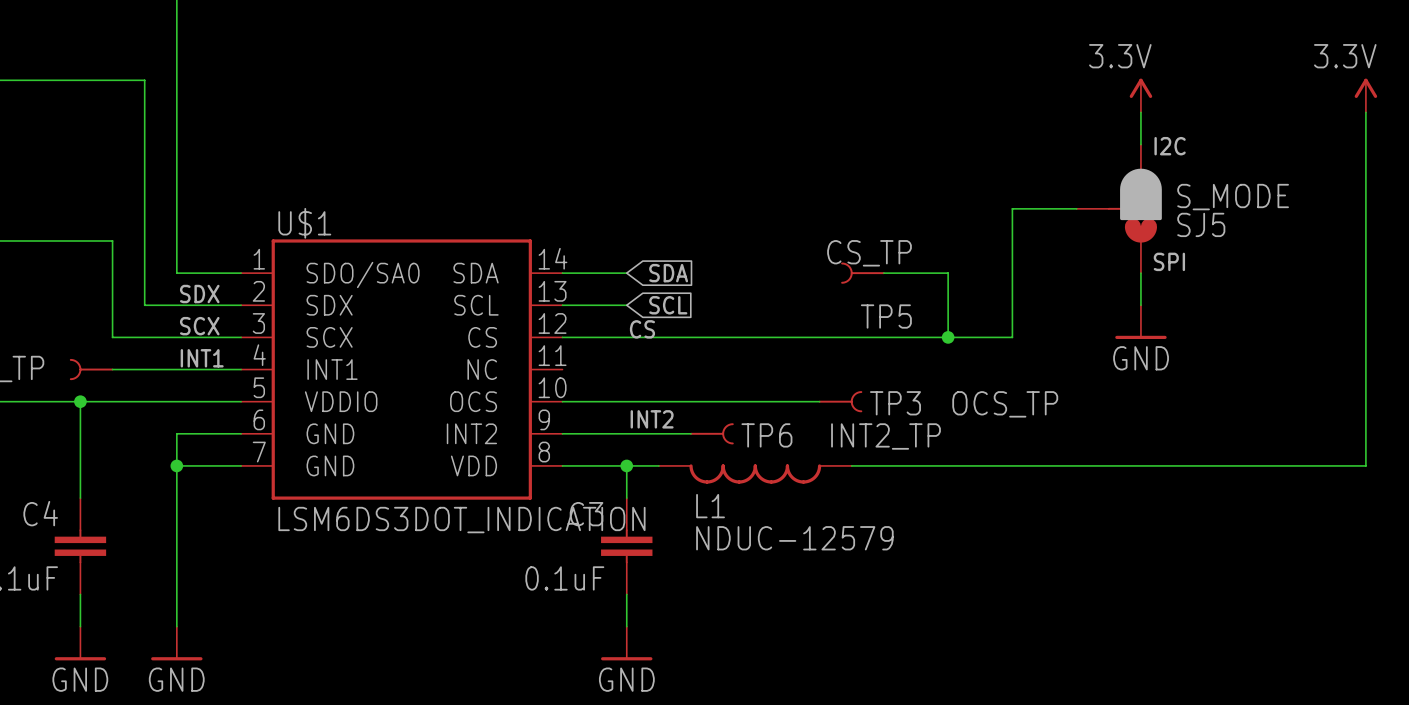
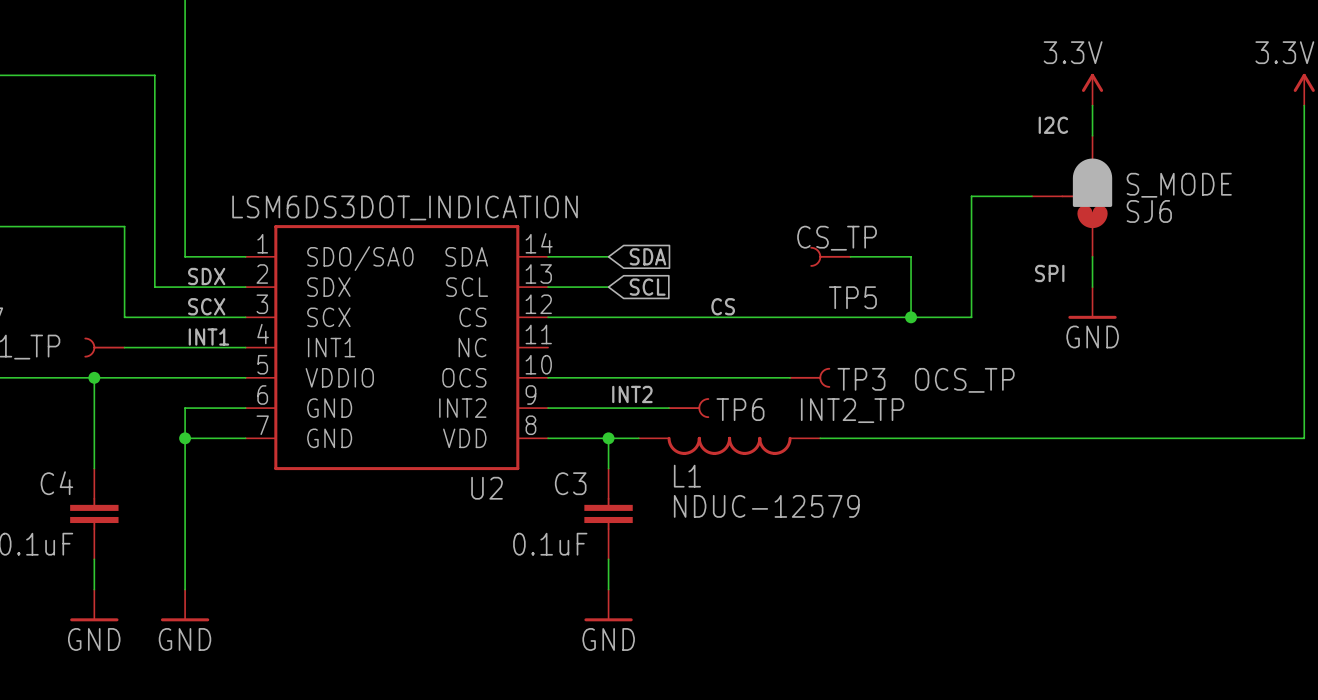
text position: I2C (1170, 146) -> I2C (1053, 125)
U$1 name: U$1 (304, 223) -> U2 (487, 488)
SJ5 name: SJ5 (1201, 224) -> SJ6 (1149, 211)
text position: SPI (1169, 261) -> SPI (1049, 273)
label position: CS (642, 329) -> CS (723, 306)
U$1 value position: LSM6DS3DOT_INDICATION (461, 520) -> LSM6DS3DOT_INDICATION (405, 207)

